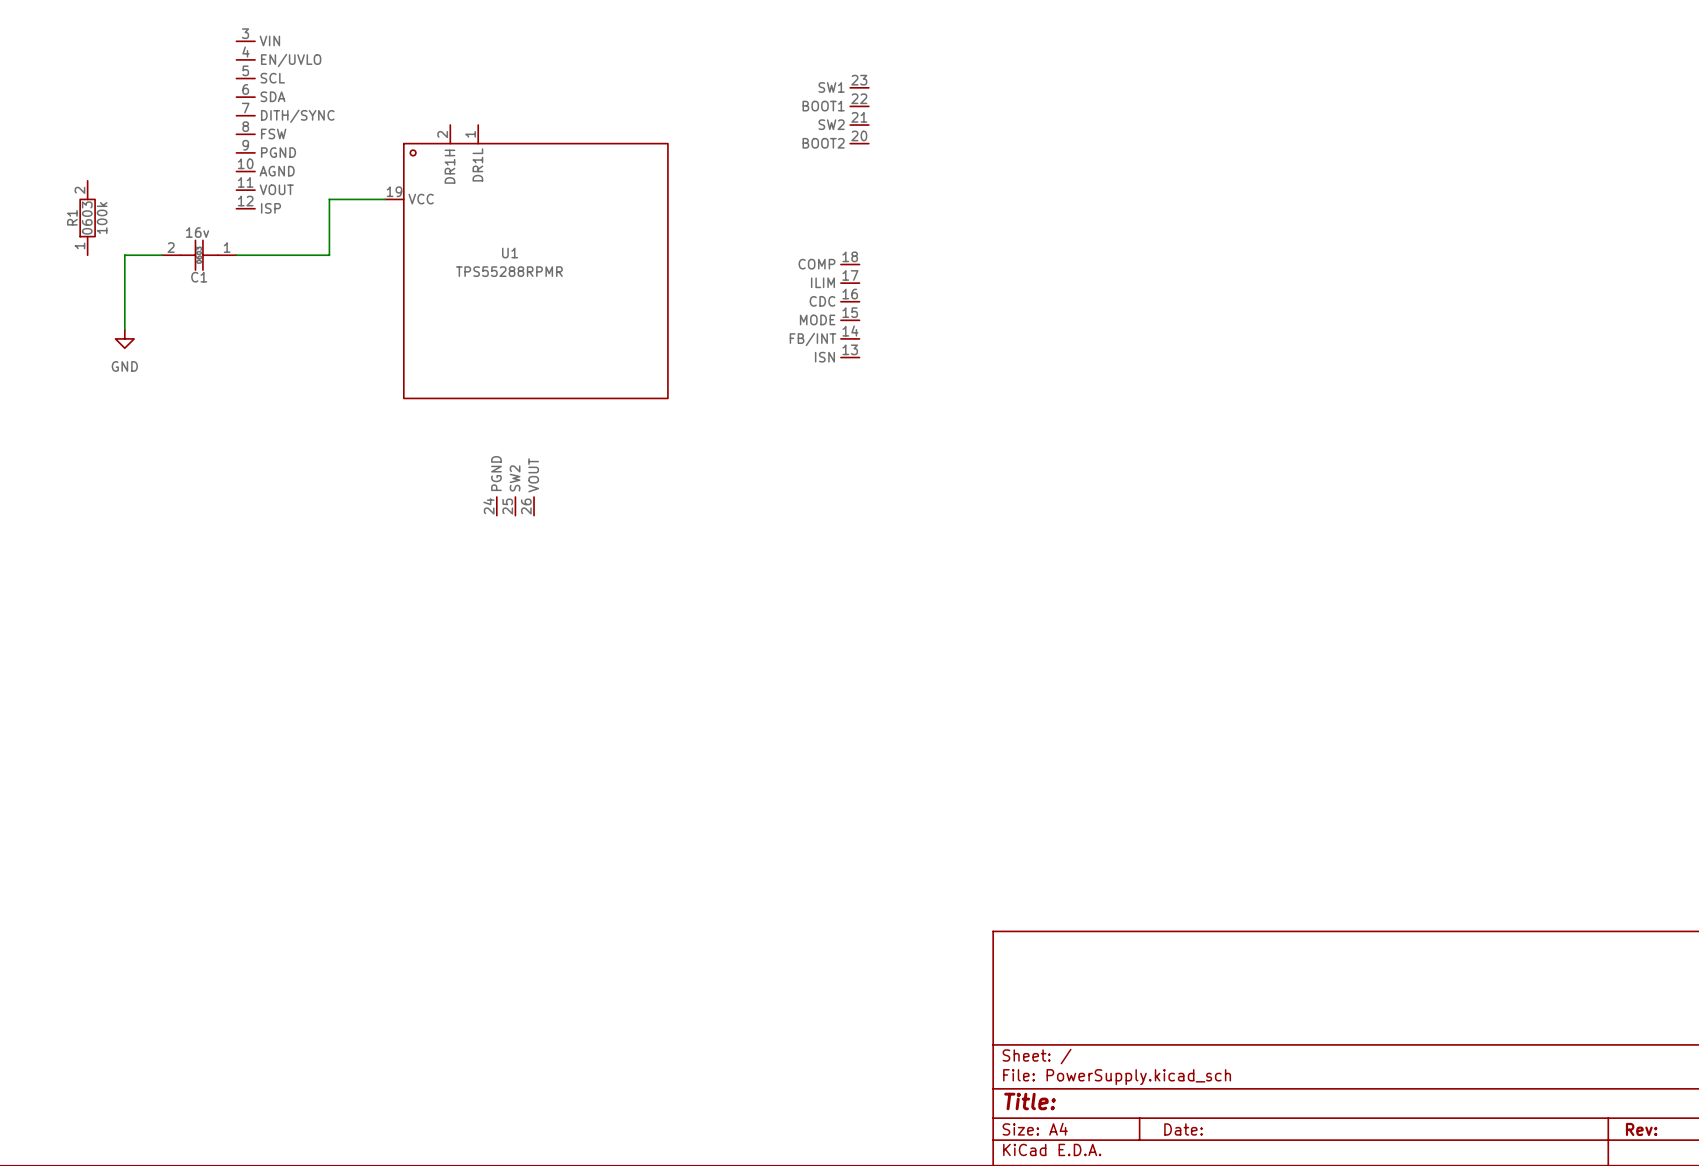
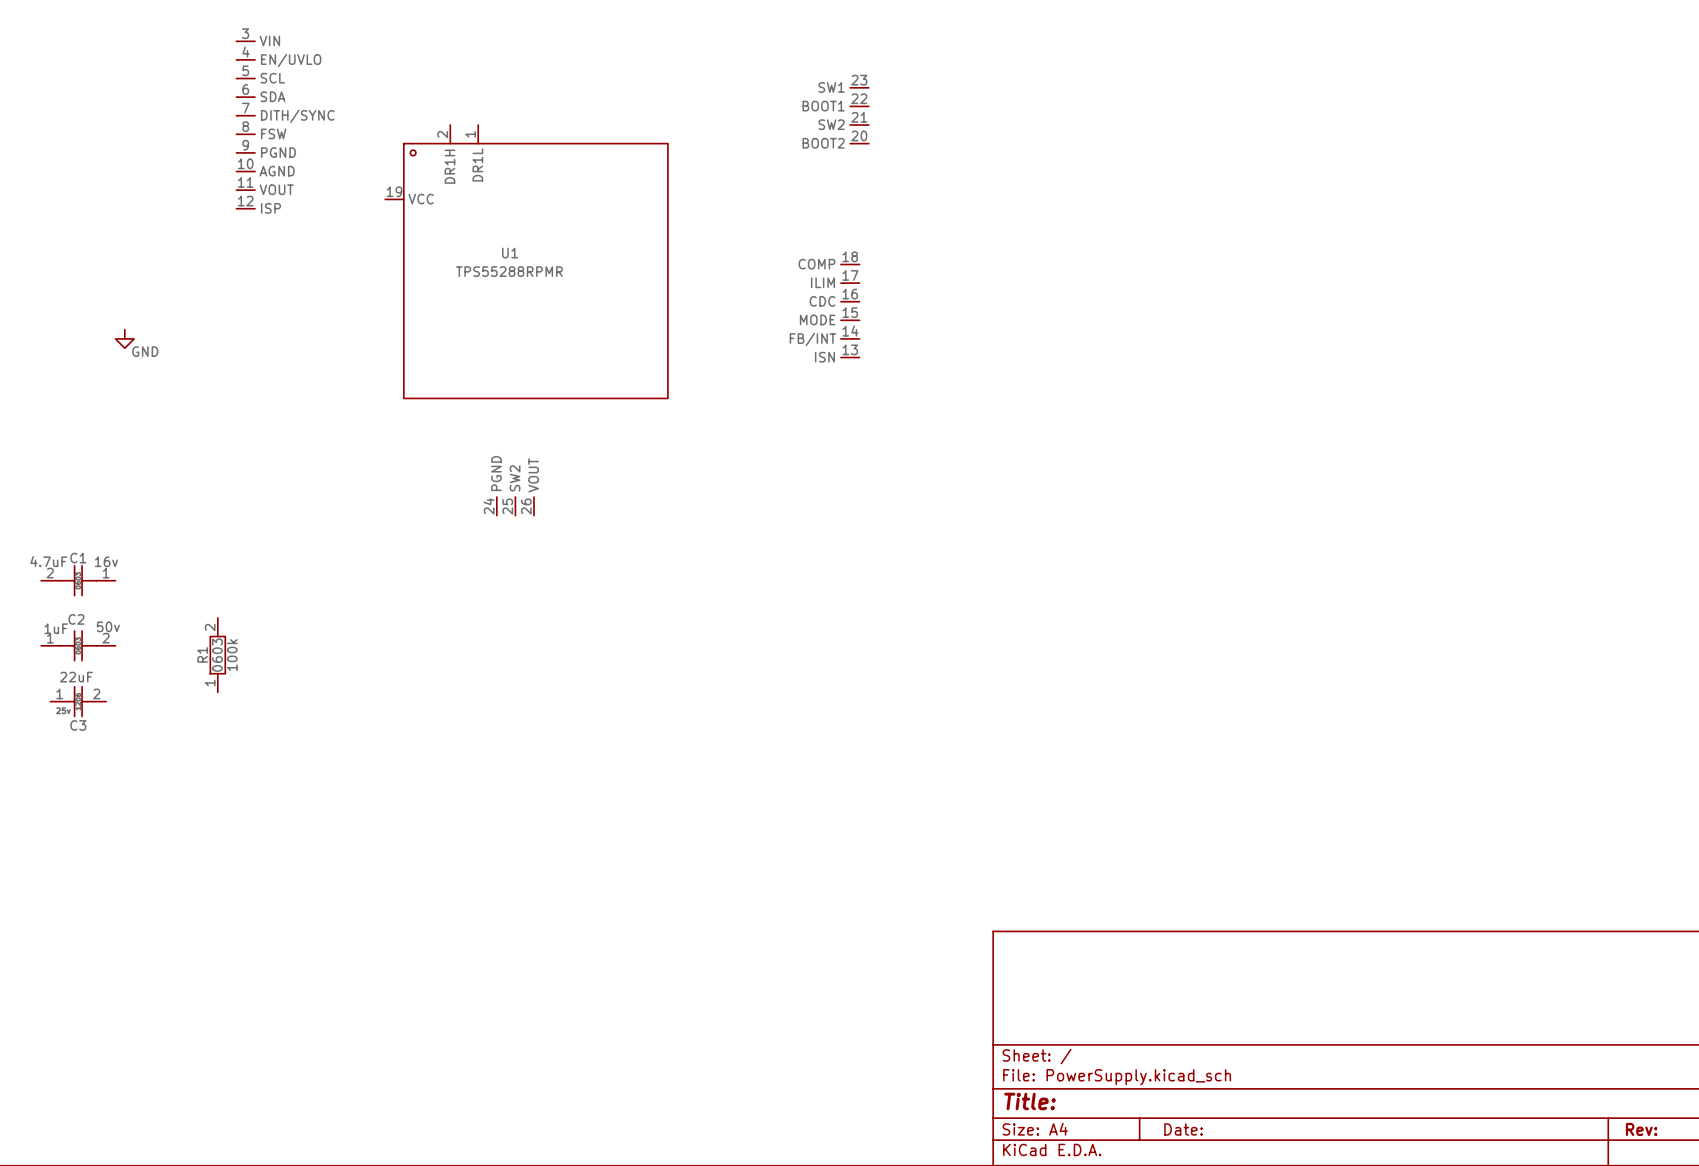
wire: (385, 199) (329, 199) (329, 255) (236, 255) -> none
R1 position: (87, 218) -> (217, 655)
C1 text position: 16v (197, 232) -> 16v (106, 561)
wire: (162, 255) (124, 255) (124, 329) -> none
C1 position: (199, 255) -> (78, 580)
C1 name position: C1 (199, 277) -> C1 (78, 558)
power symbol text position: GND (124, 366) -> GND (145, 351)
C1 text: none -> 4.7uF (48, 561)
C2: none -> (78, 645)
C3: none -> (78, 701)

